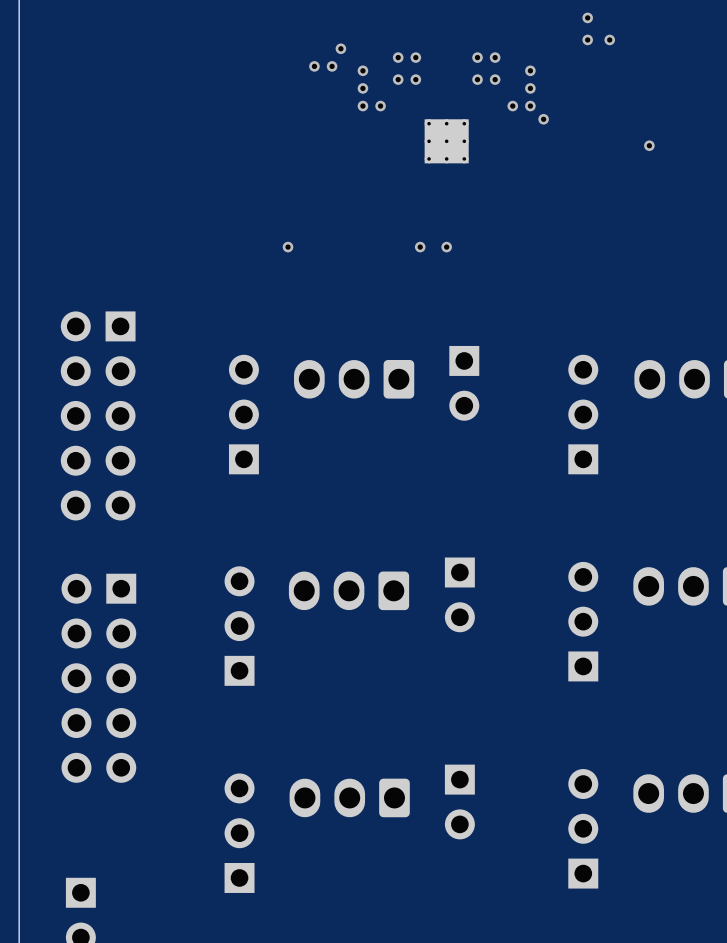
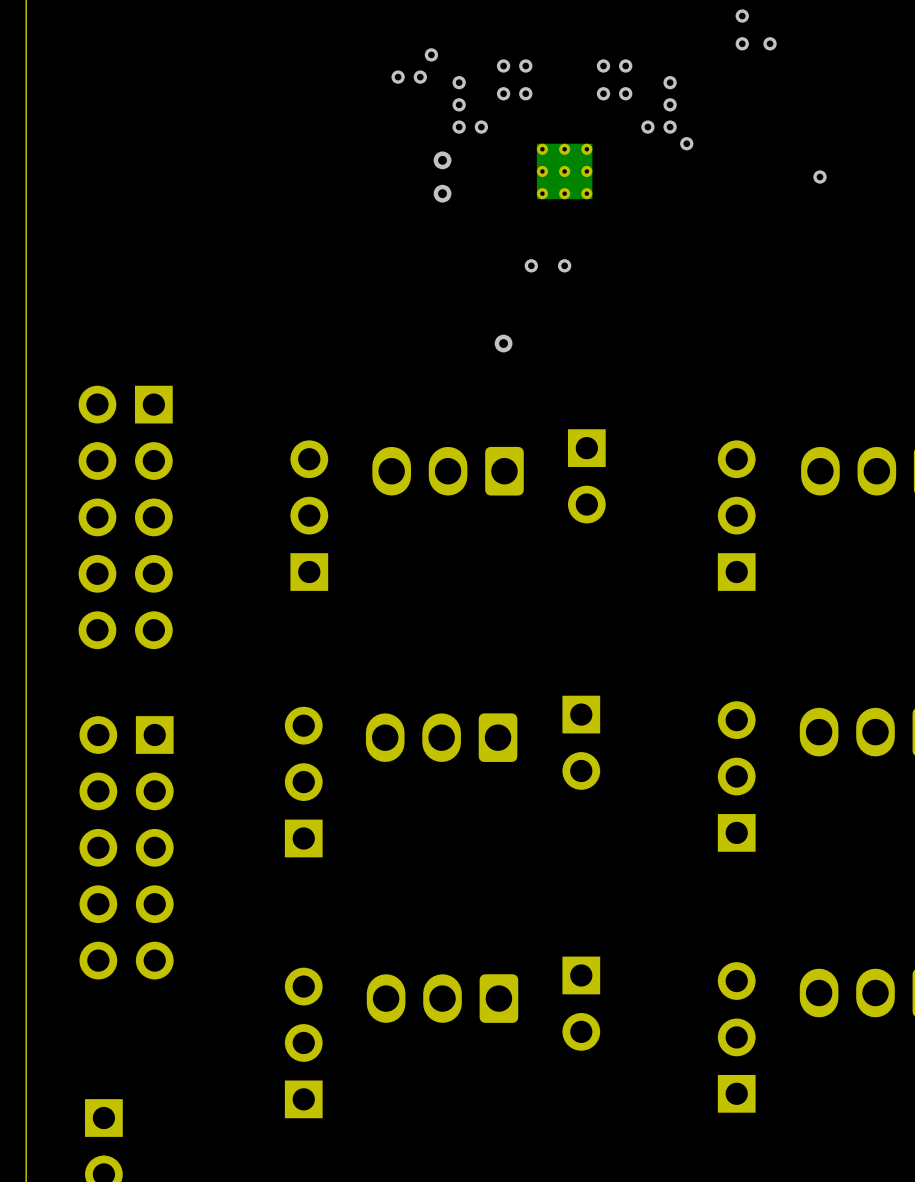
via: none -> (442, 160)
via: none -> (442, 193)
via: none -> (531, 265)
via: none -> (564, 265)
via: (288, 247) -> none
via: (420, 247) -> none
via: (446, 247) -> none
via: none -> (503, 343)

